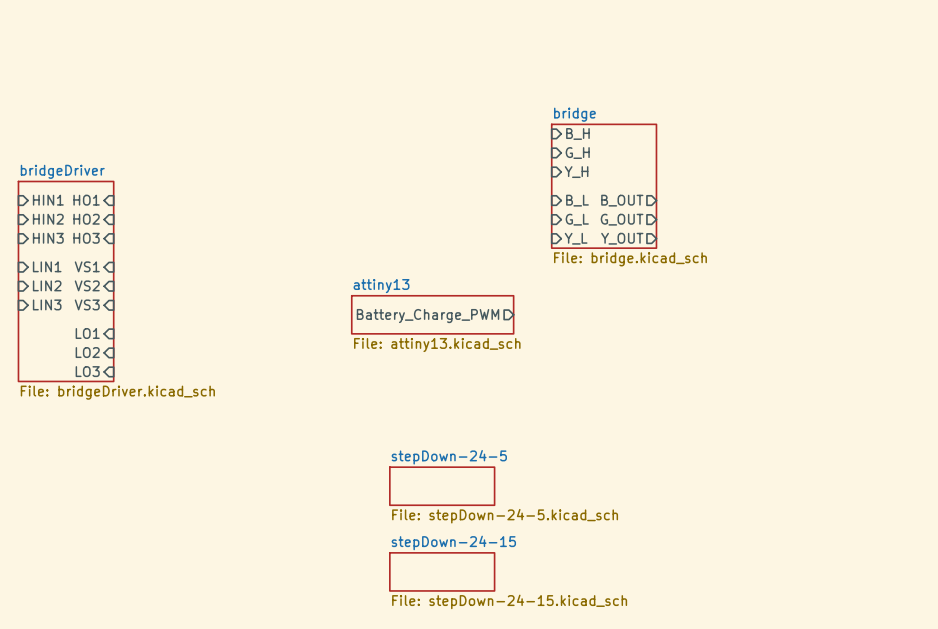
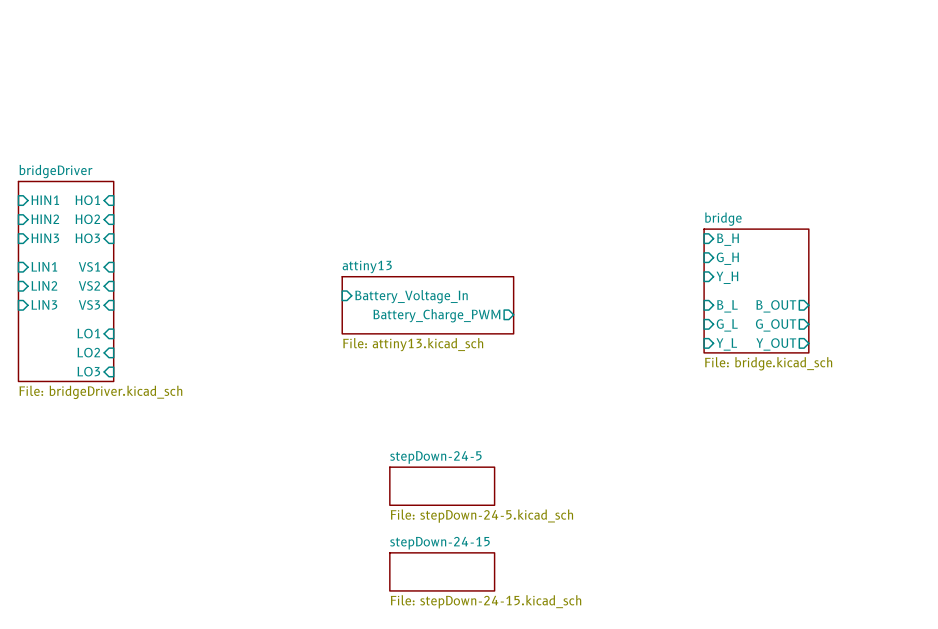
sheet pin position: B_H (577, 133) -> B_H (728, 239)
sheet pin position: G_H (577, 153) -> G_H (727, 258)
sheet pin position: Y_H (576, 172) -> Y_H (727, 277)
sheet bridge position: (604, 186) -> (756, 291)
sheet pin position: B_L (577, 200) -> B_L (727, 306)
sheet pin position: B_OUT (622, 200) -> B_OUT (776, 306)
sheet pin position: G_L (577, 219) -> G_L (727, 325)
sheet pin position: G_OUT (622, 219) -> G_OUT (776, 325)
sheet pin position: Y_L (576, 238) -> Y_L (726, 344)
sheet pin position: Y_OUT (622, 238) -> Y_OUT (776, 344)
sheet attiny13 shape: [351, 295, 515, 335] -> [341, 276, 515, 335]
sheet pin: none -> Battery_Voltage_In (411, 296)

